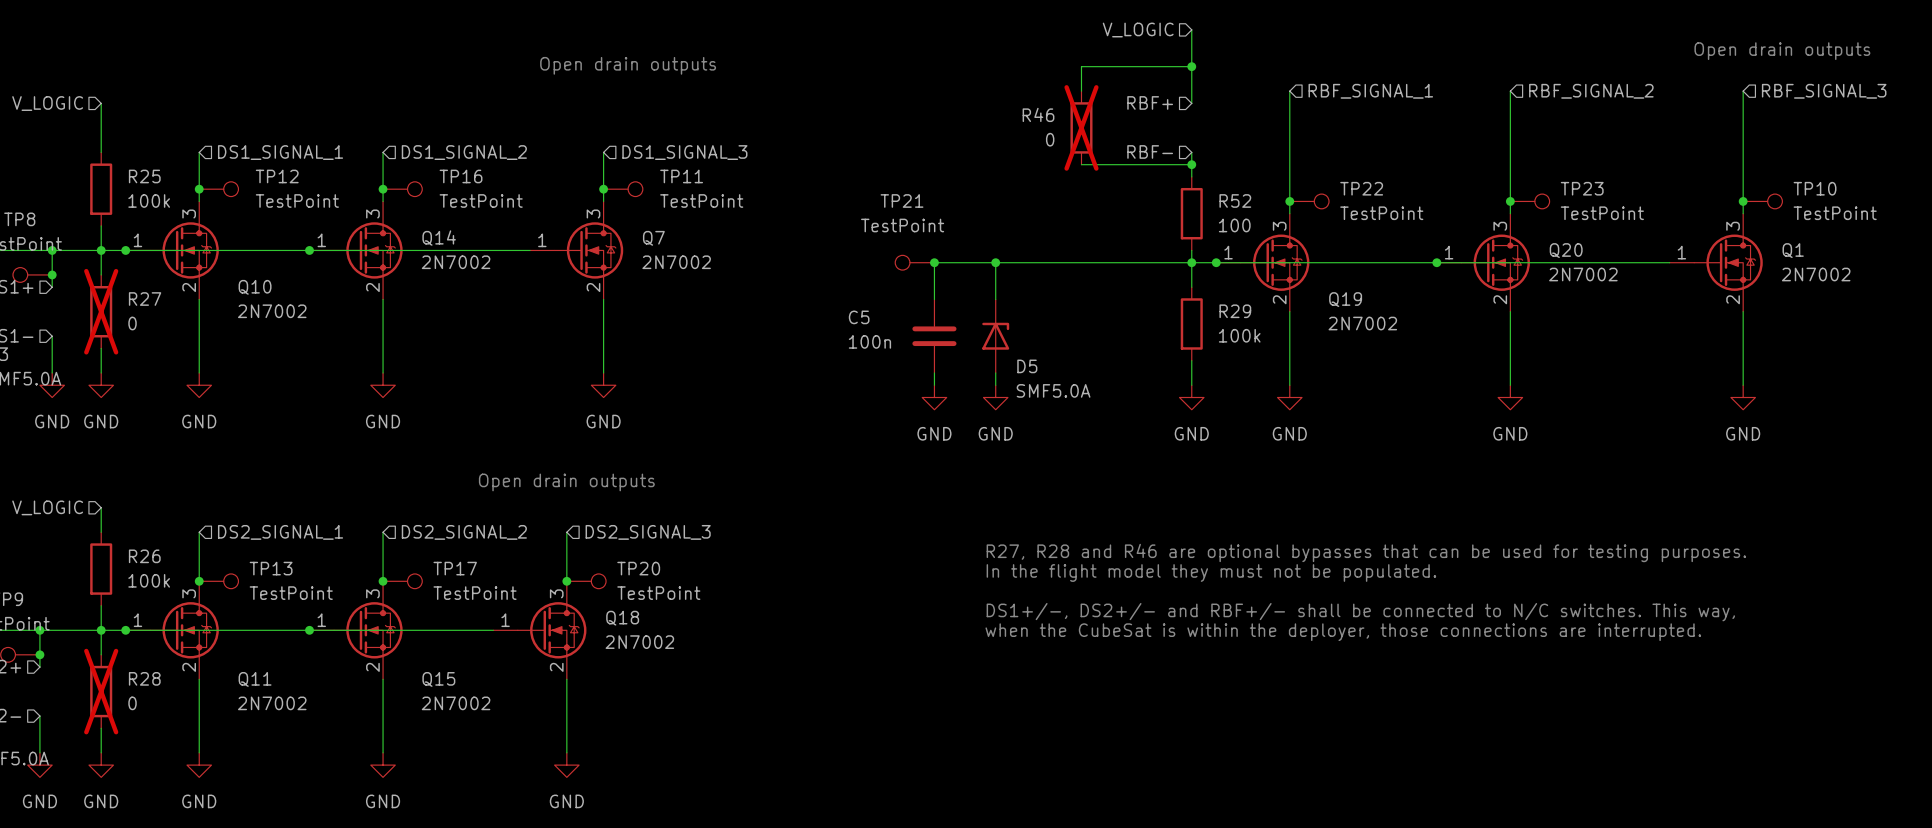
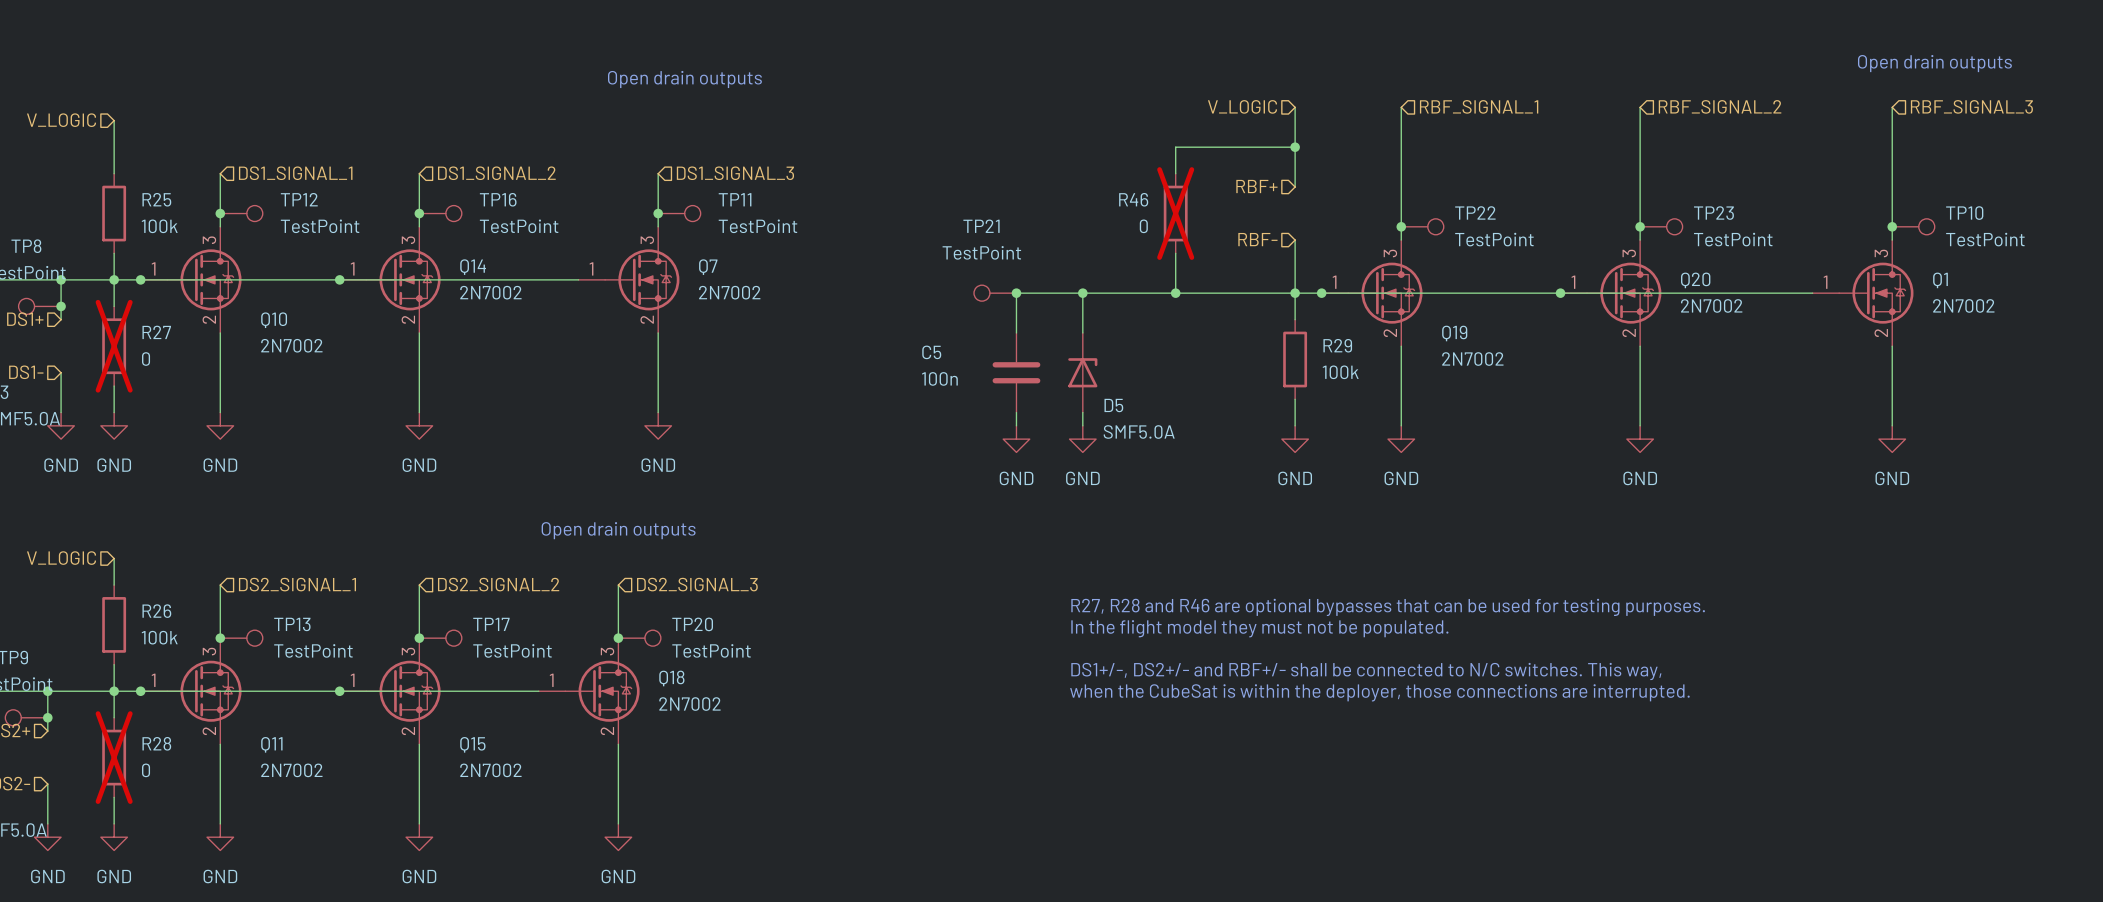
wire: (1191, 29) (1191, 91) -> none
hierarchical label position: V_LOGIC (1138, 30) -> V_LOGIC (1242, 106)
wire: (1191, 66) (1081, 66) (1081, 91) -> (1295, 147) (1175, 147) (1175, 173)
junction: (1191, 66) -> none
hierarchical label position: RBF+ (1150, 102) -> RBF+ (1256, 186)
wire: none -> (1295, 120) (1295, 173)
R46 position: (1081, 127) -> (1175, 213)
junction: none -> (1295, 147)
hierarchical label position: RBF- (1150, 151) -> RBF- (1257, 239)
wire: (1081, 164) (1191, 164) (1191, 176) -> none
junction: (1191, 164) -> none
wire: none -> (1295, 240) (1295, 279)
R52: 100 (1191, 213) -> none
wire: none -> (1175, 253) (1175, 293)
junction: none -> (1175, 293)

